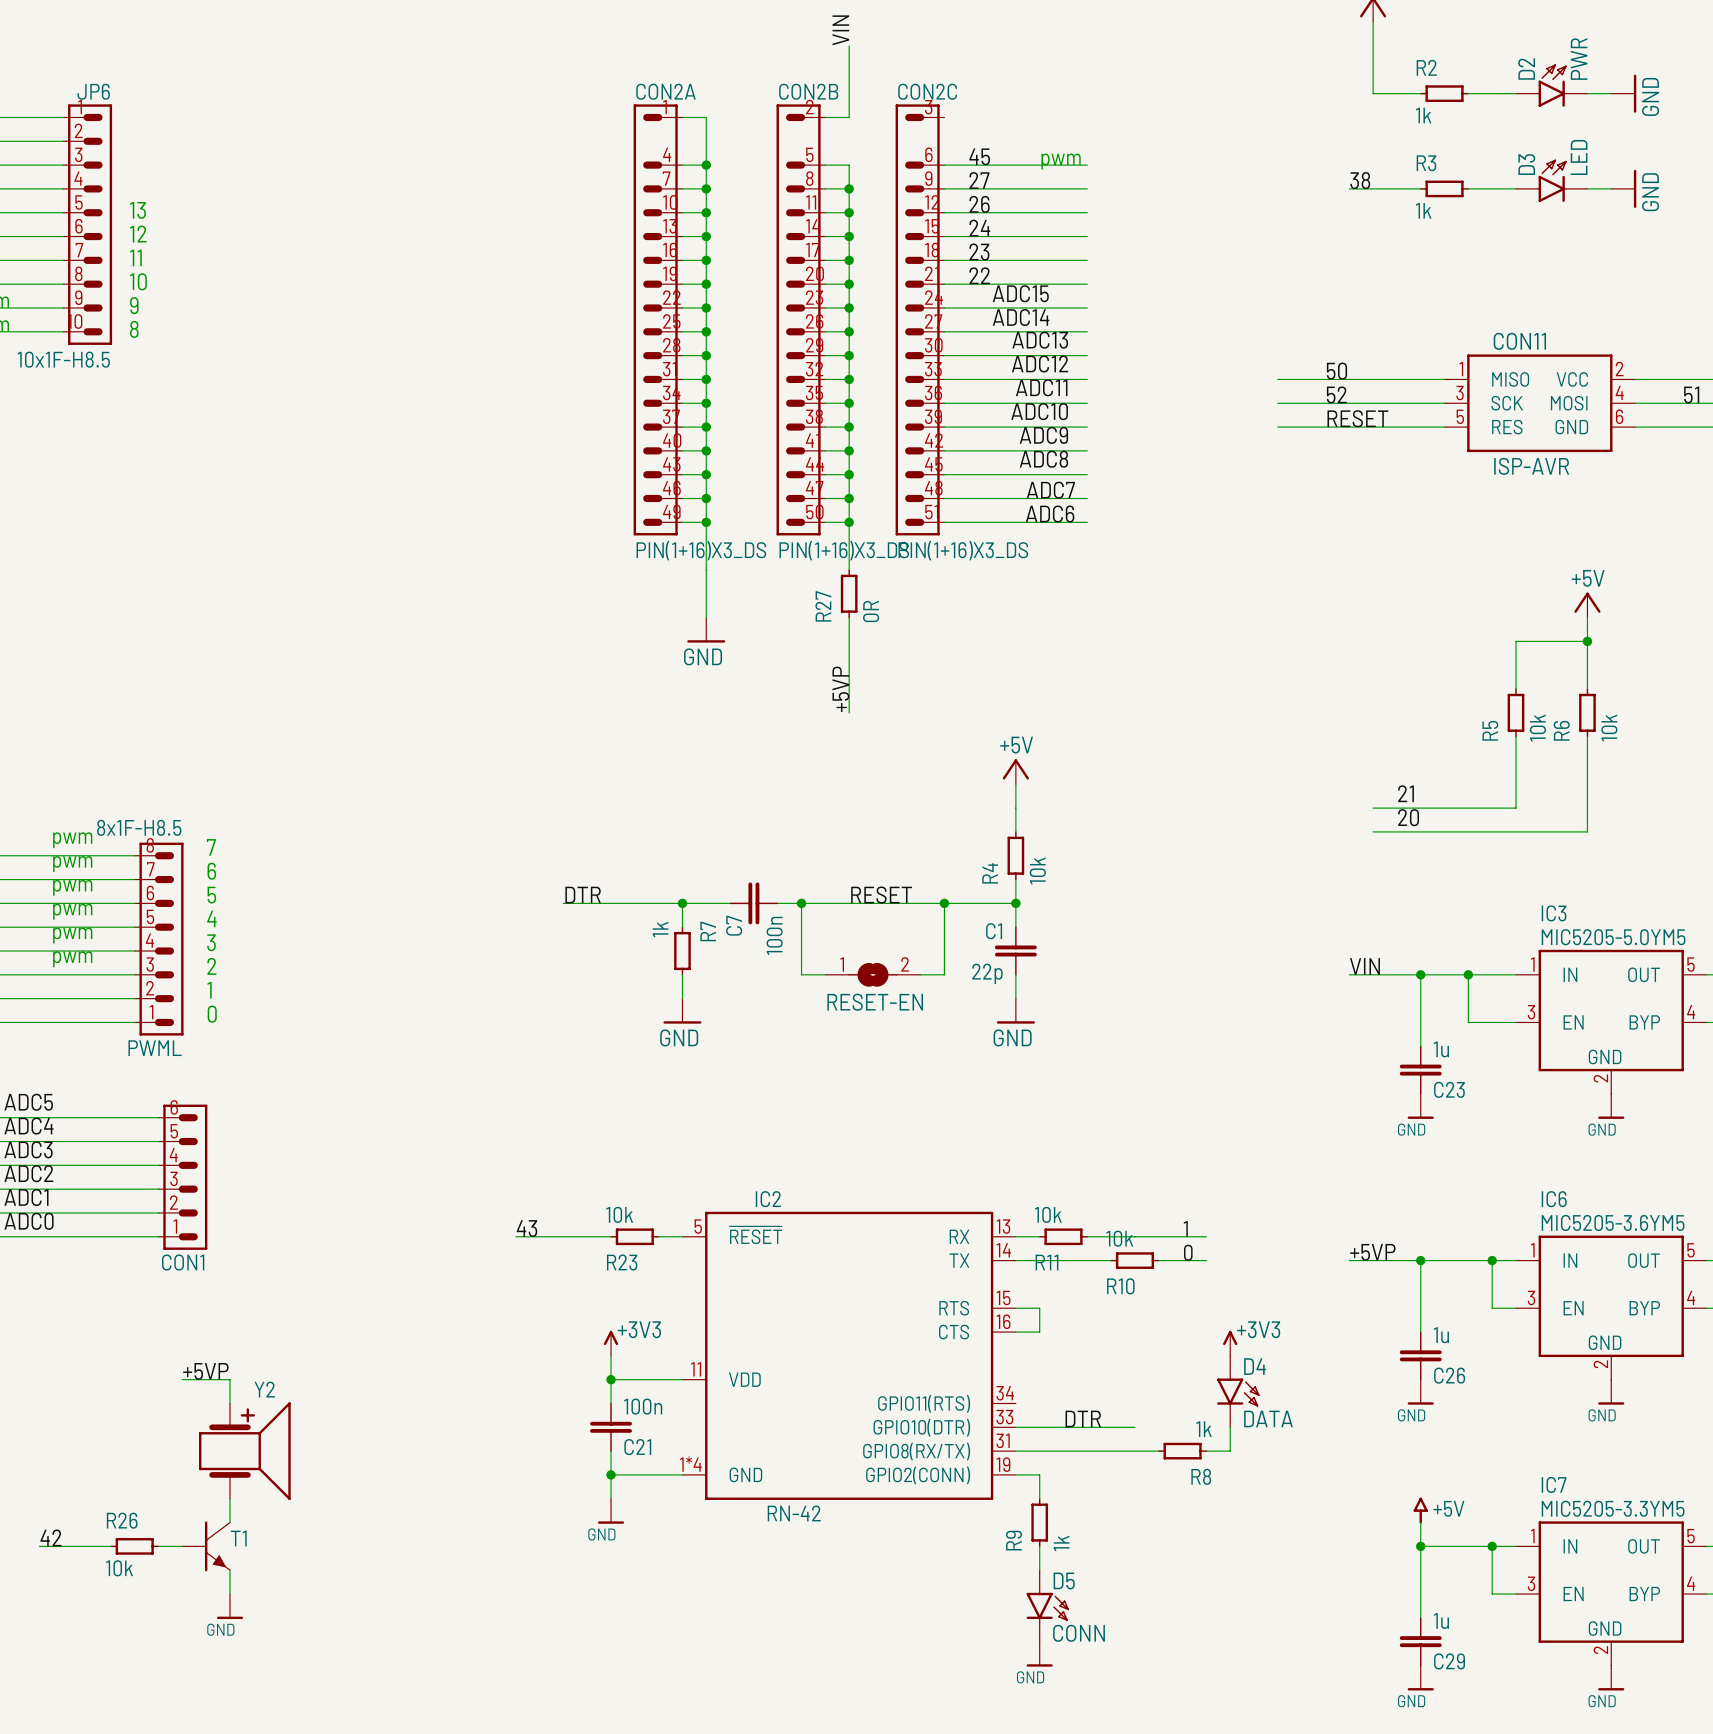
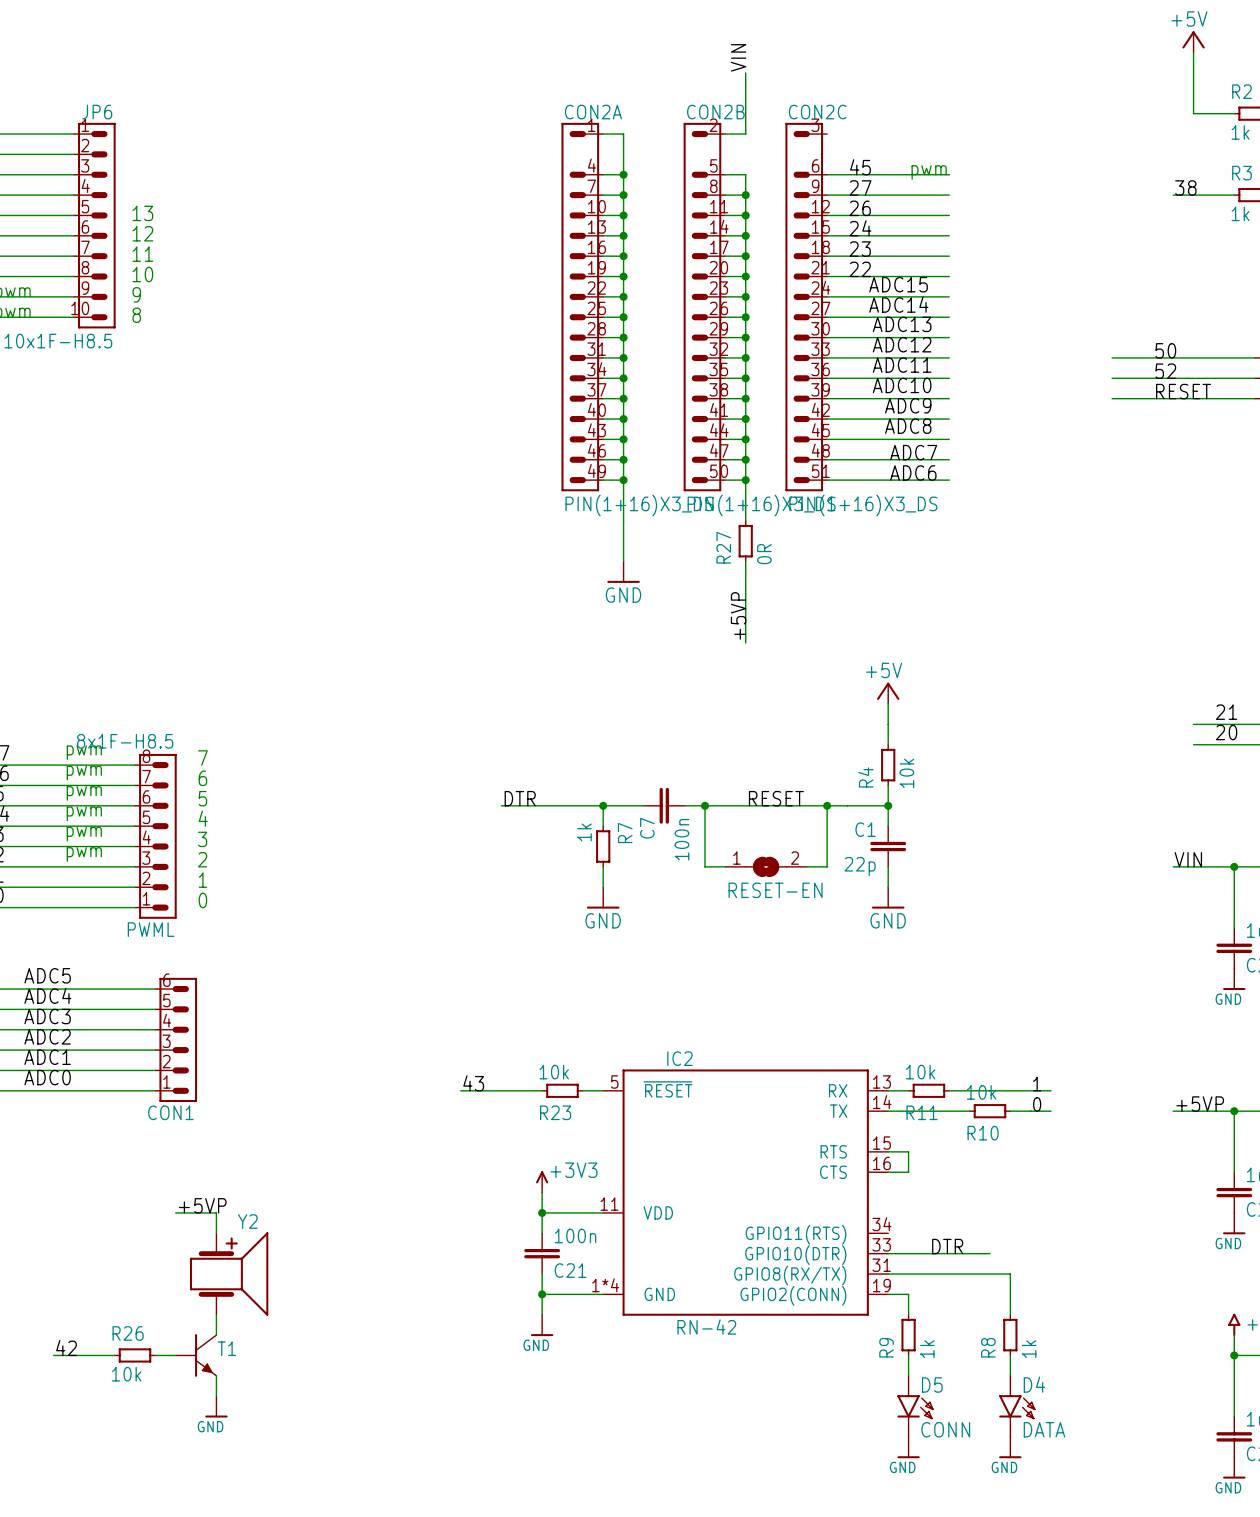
power symbol: +3V3 (1230, 1343) -> none
D4 position: (1238, 1391) -> (1017, 1406)
wire: (1230, 1427) (1230, 1451) (1206, 1451) -> none
wire: none -> (1010, 1274) (1010, 1314)
R8 rotation: 0° (1182, 1451) -> 90° clockwise (1010, 1335)
R8 position: (1182, 1451) -> (1010, 1335)
wire: none -> (1010, 1355) (1010, 1375)
power symbol: none -> GND (1010, 1447)

